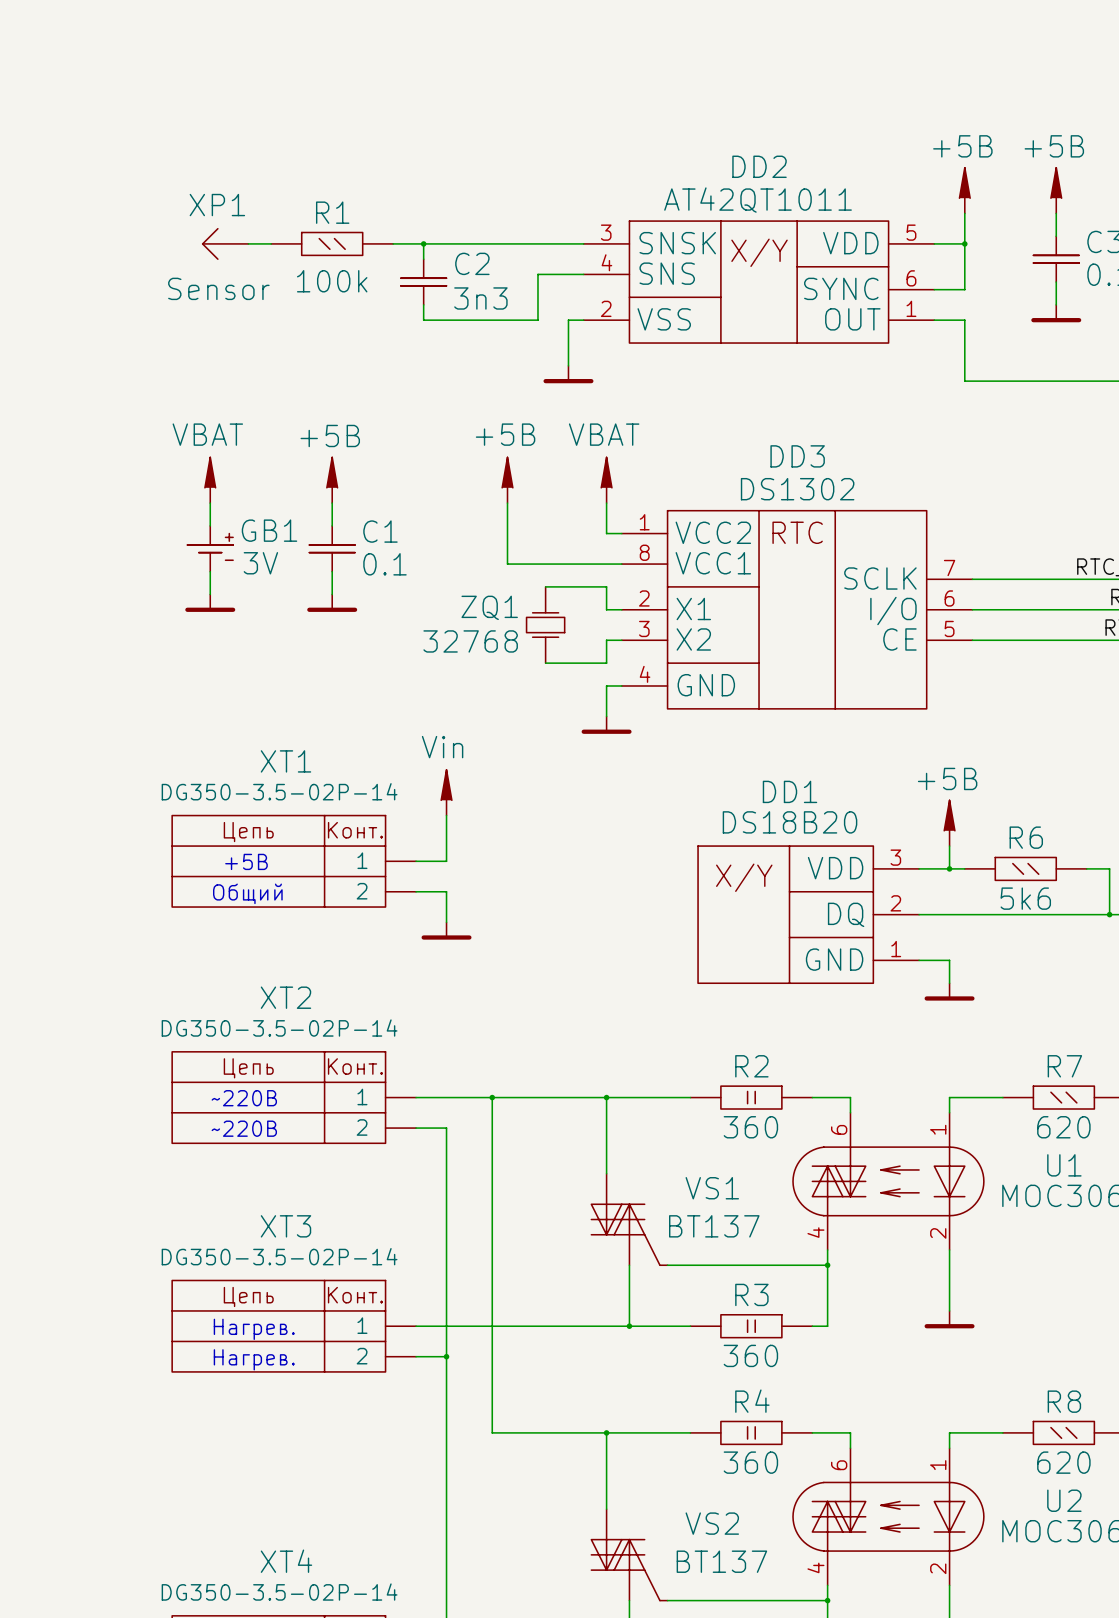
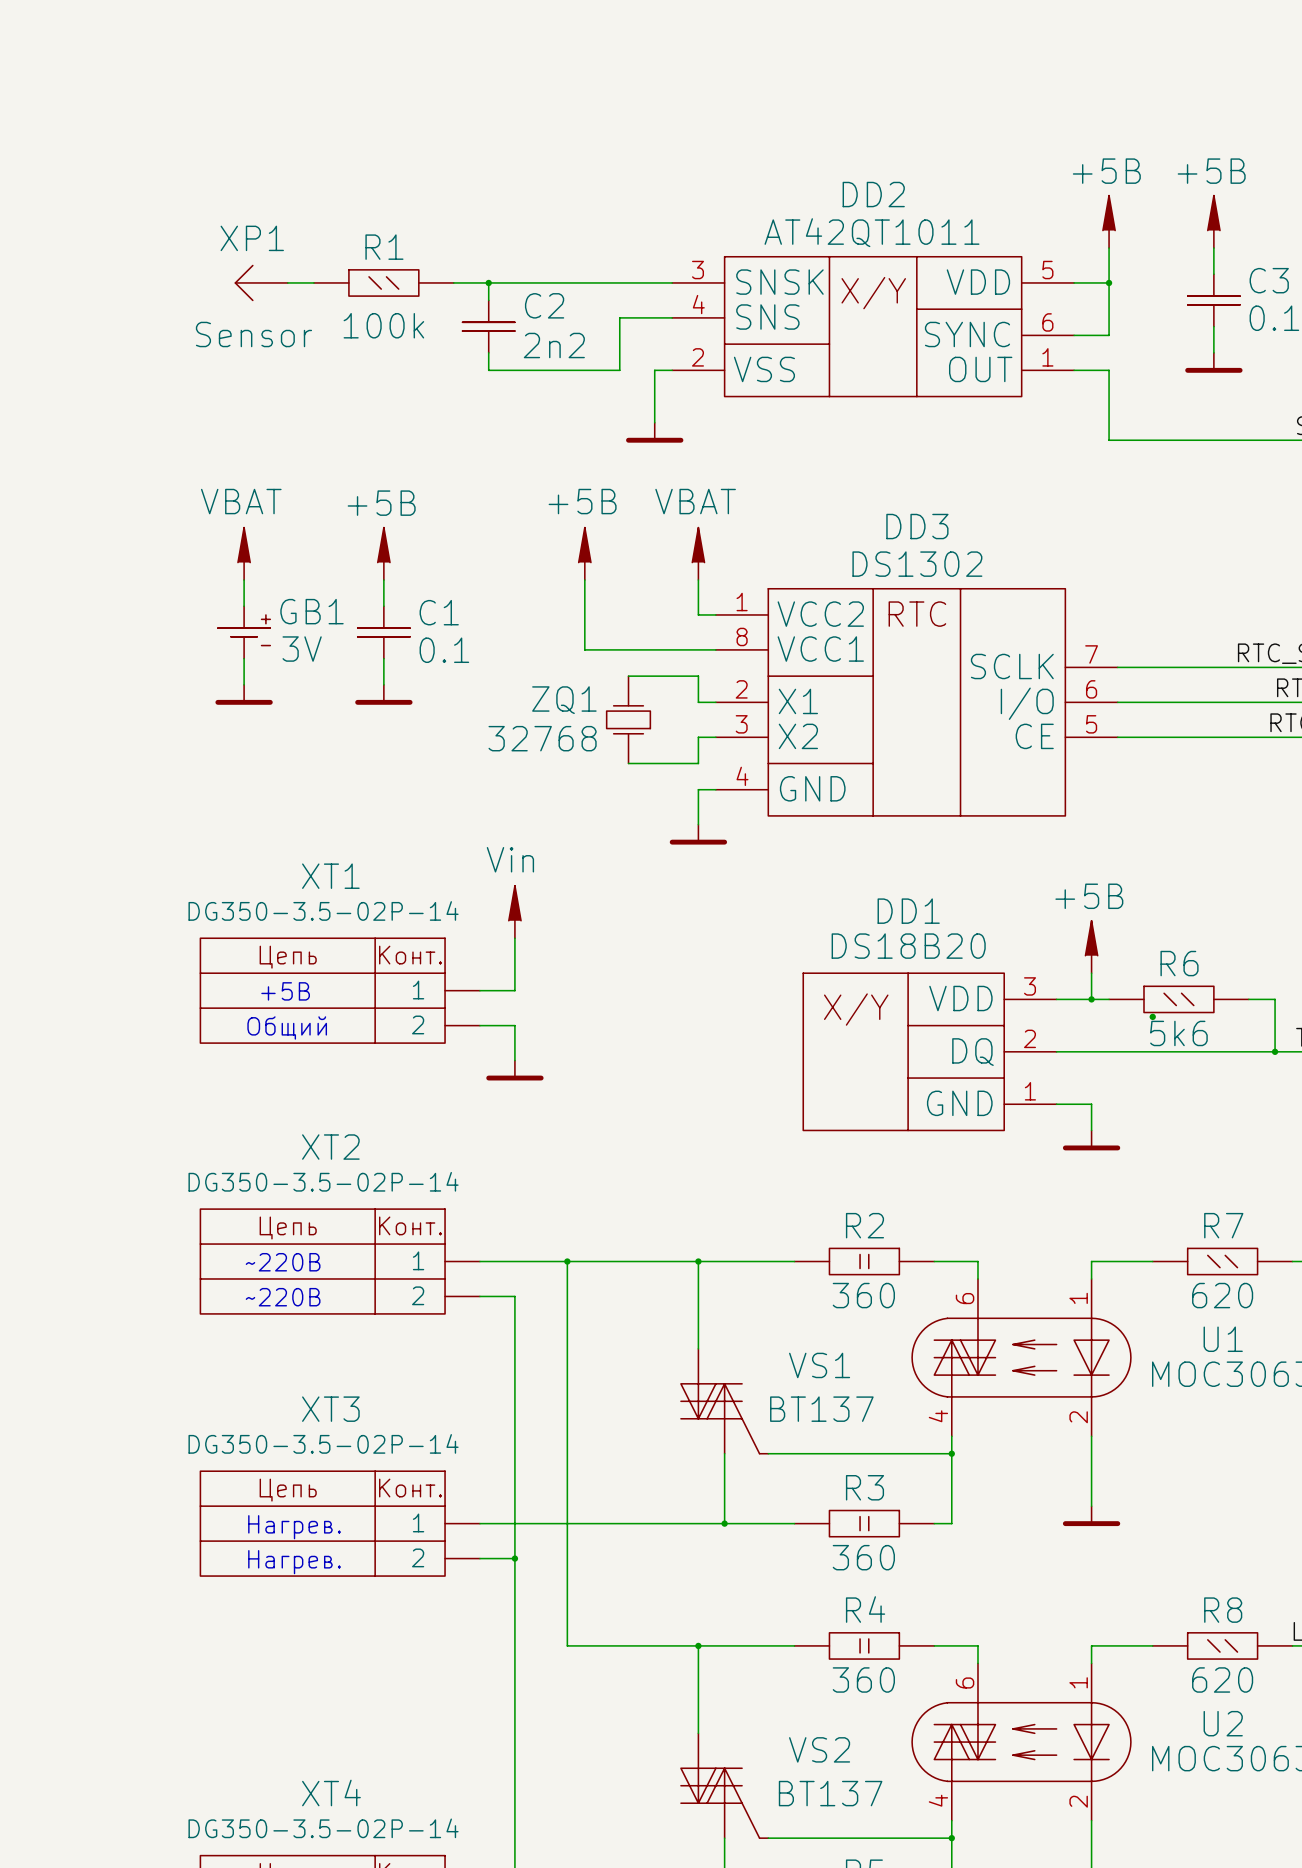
C2 value: 3n3 (480, 298) -> 2n2 (554, 345)
junction: none -> (1152, 1016)

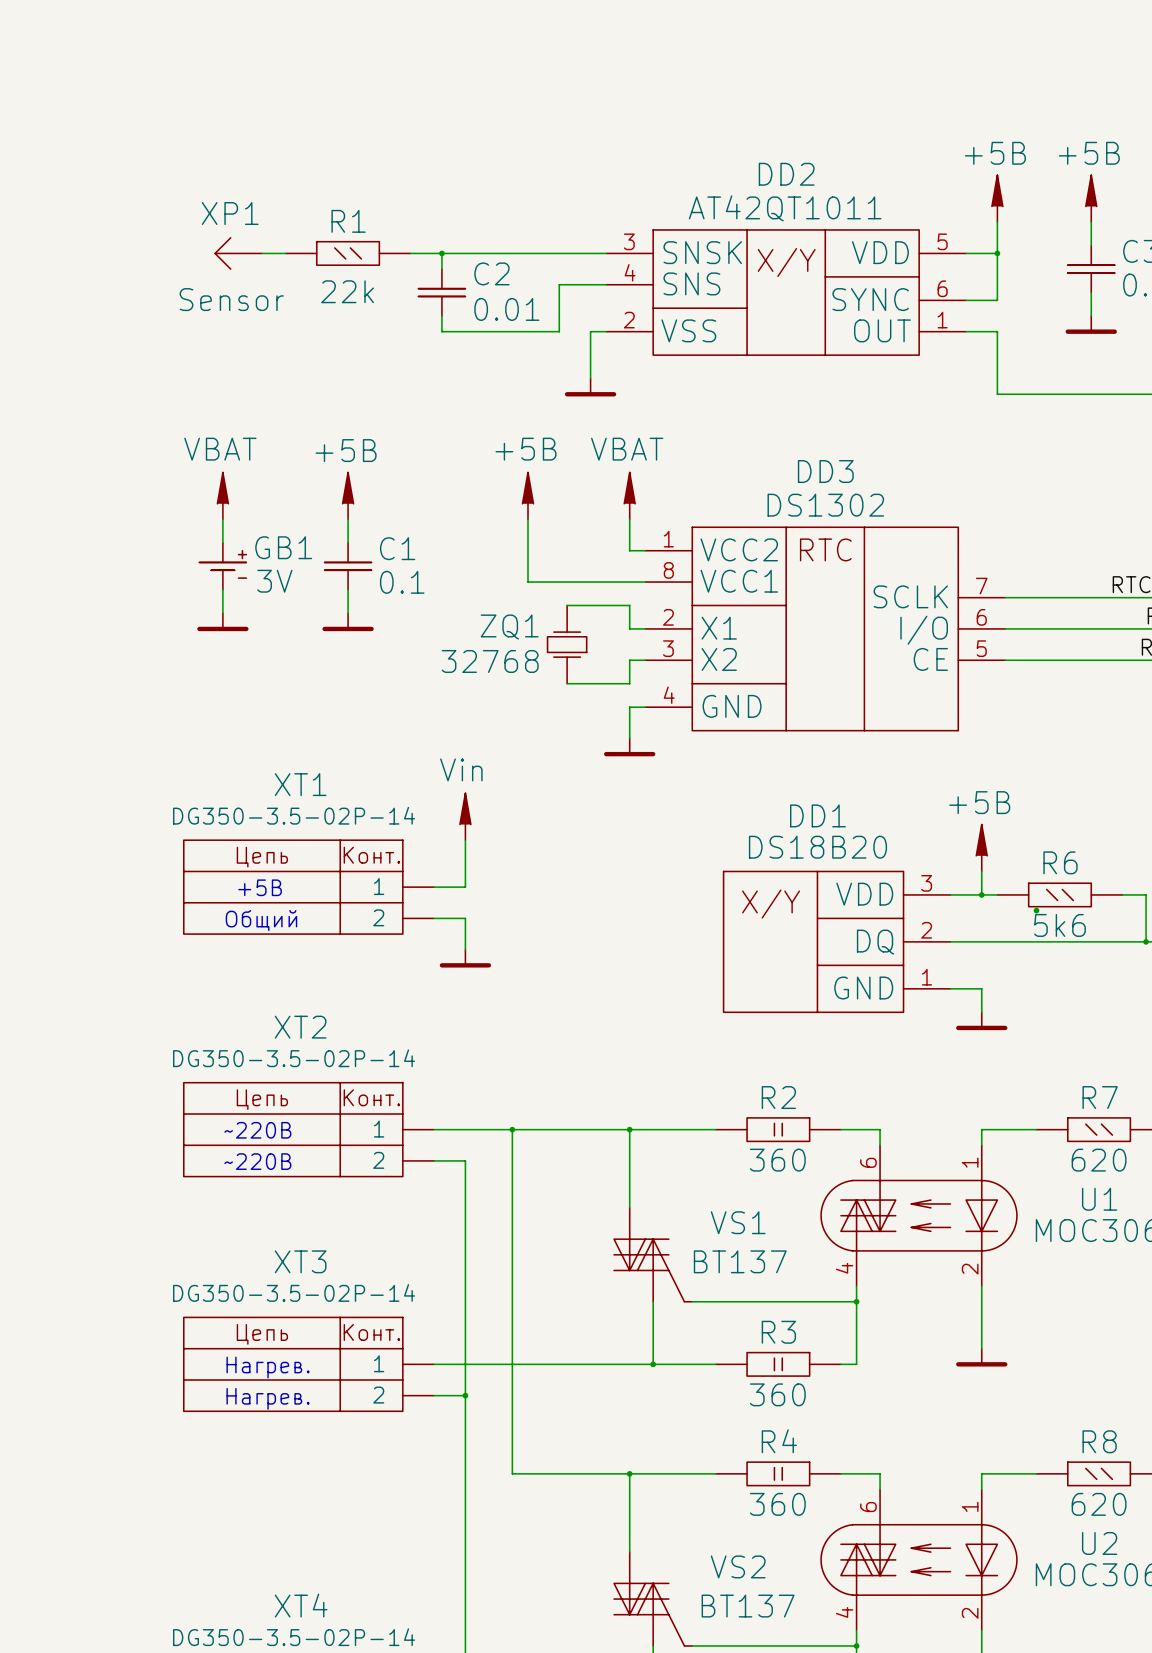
R1 value: 100k (383, 325) -> 22k (347, 291)
C2 value: 2n2 (554, 345) -> 0.01 (506, 309)

